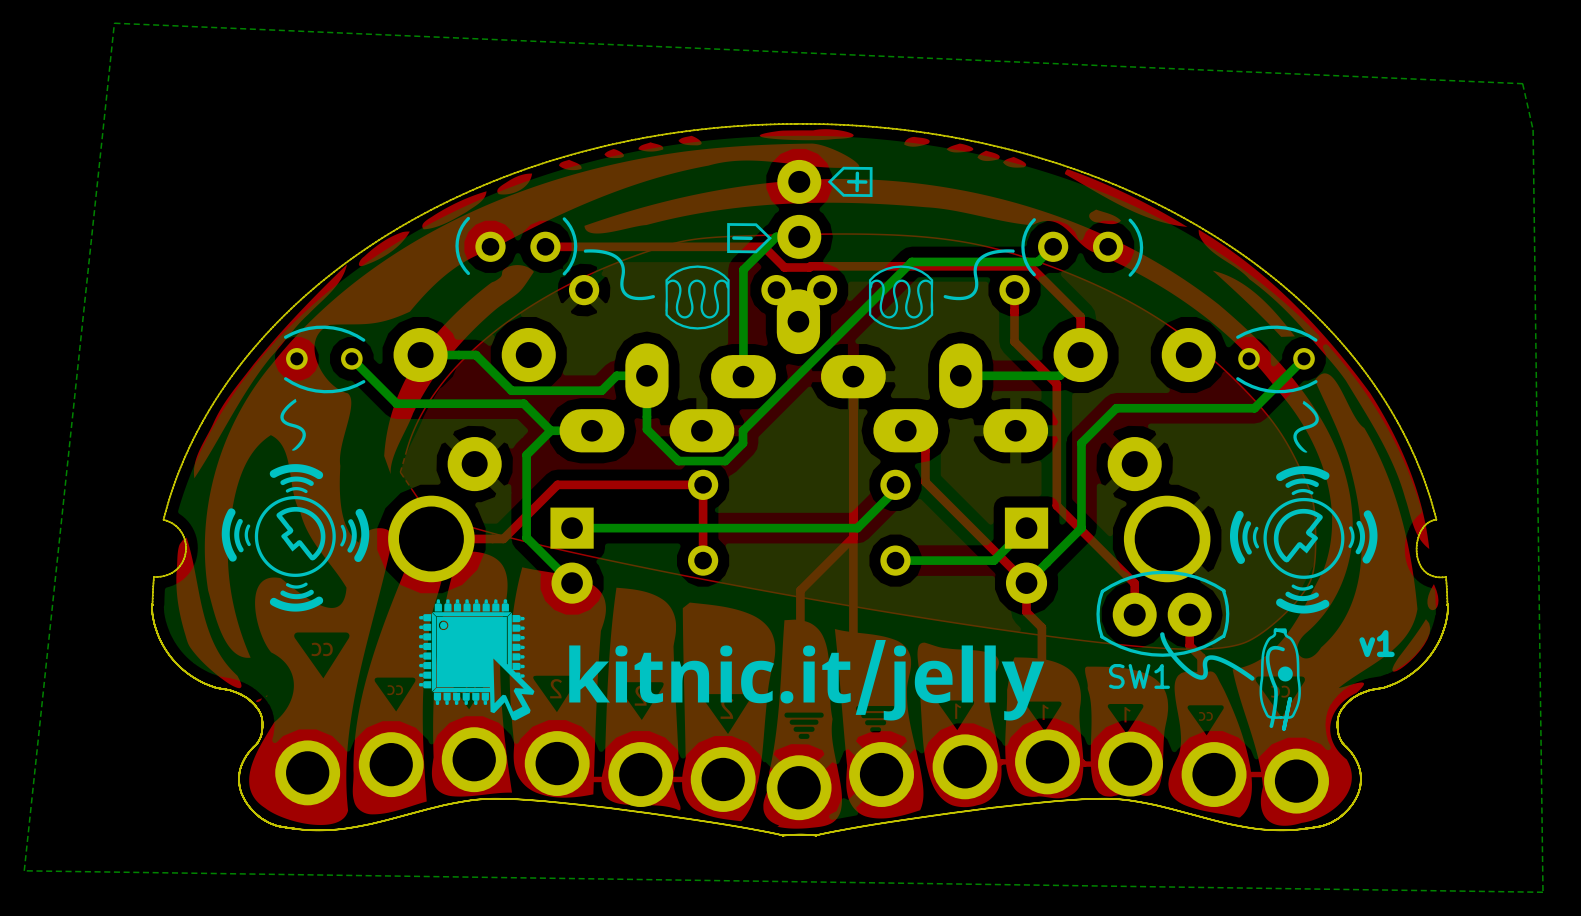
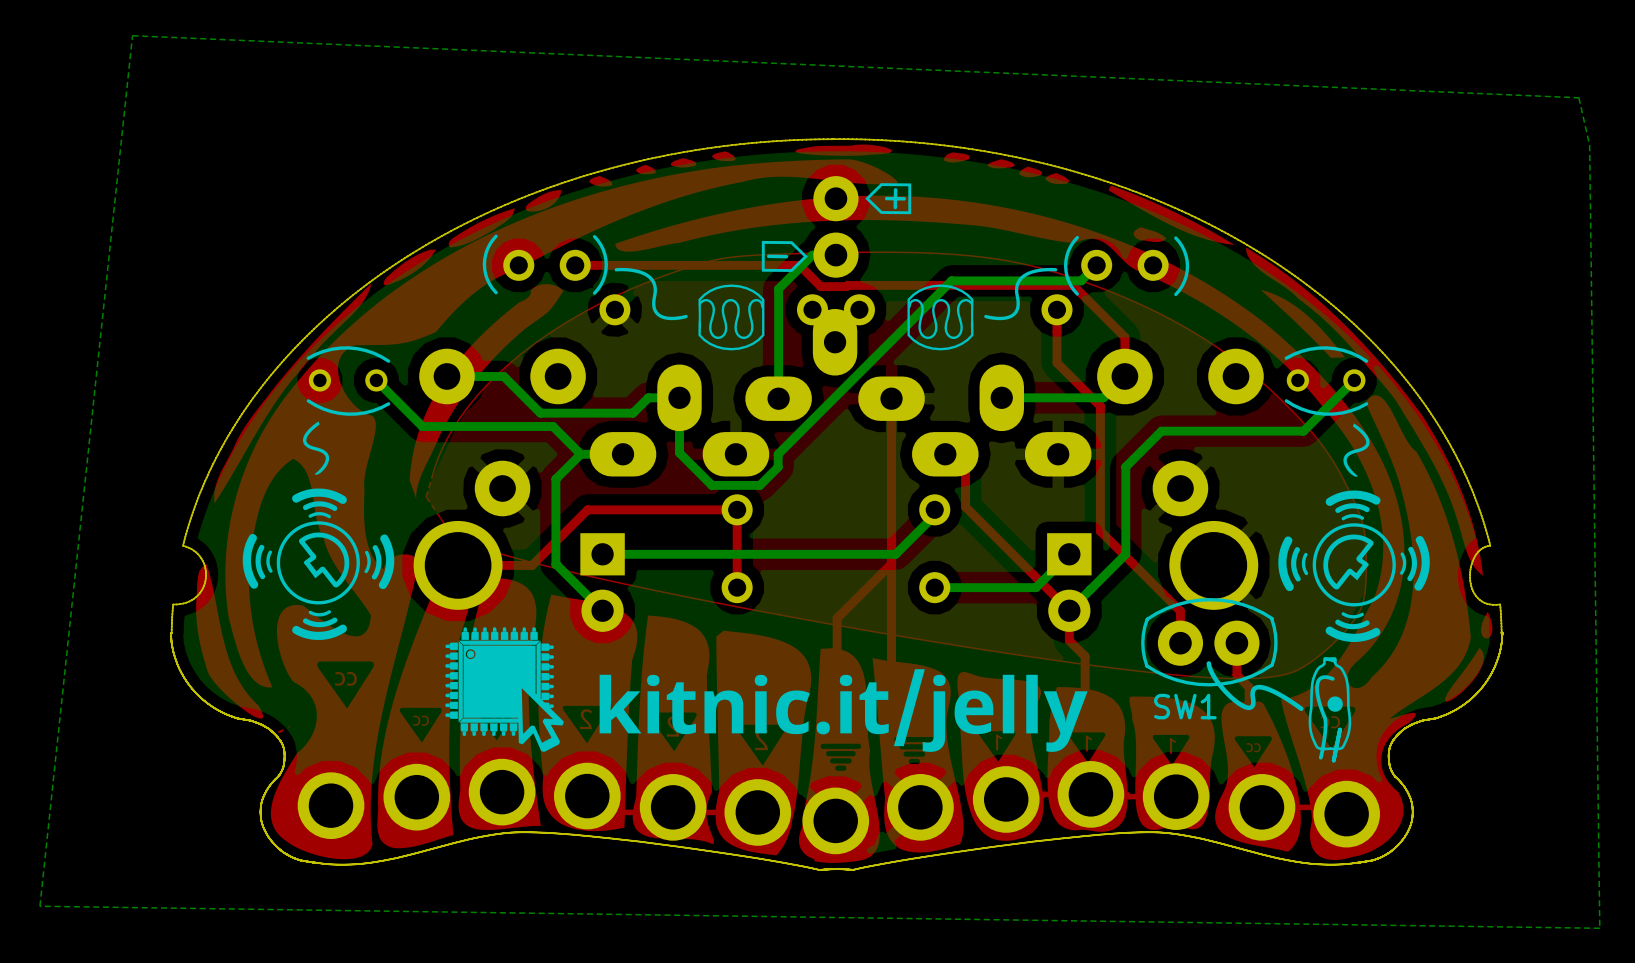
text: v1 (1377, 643) -> none

